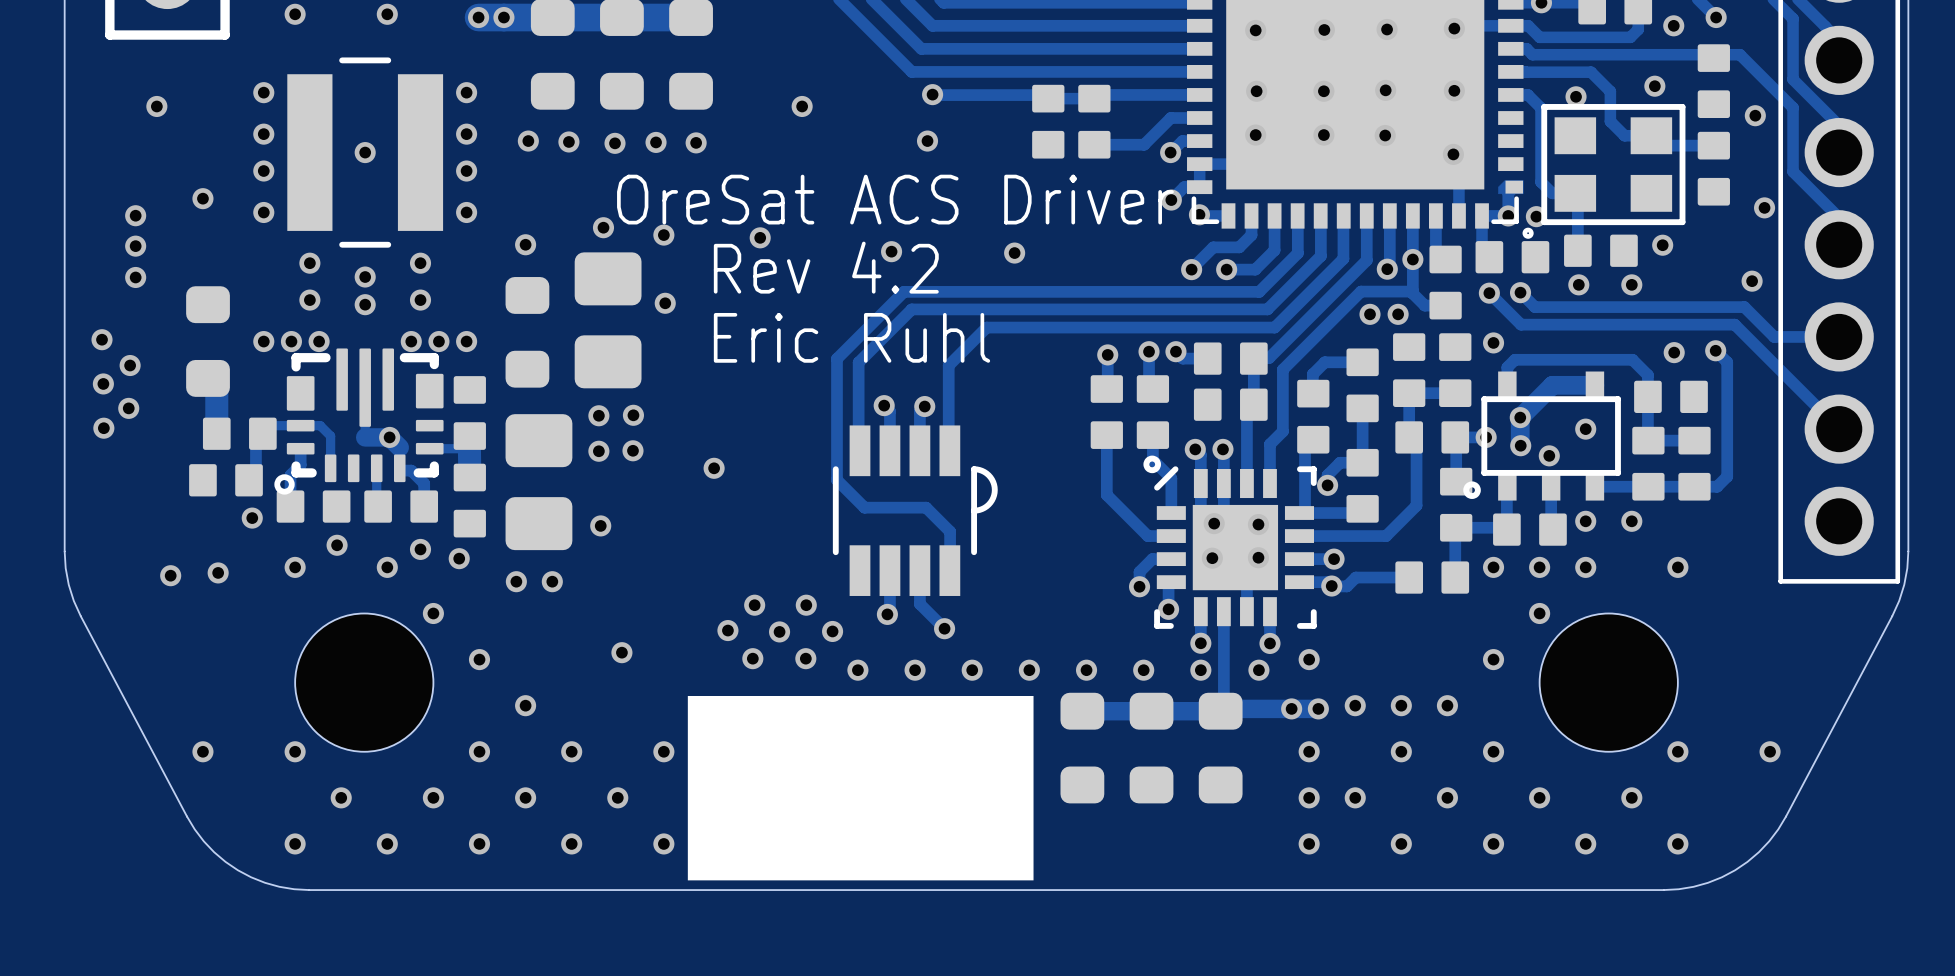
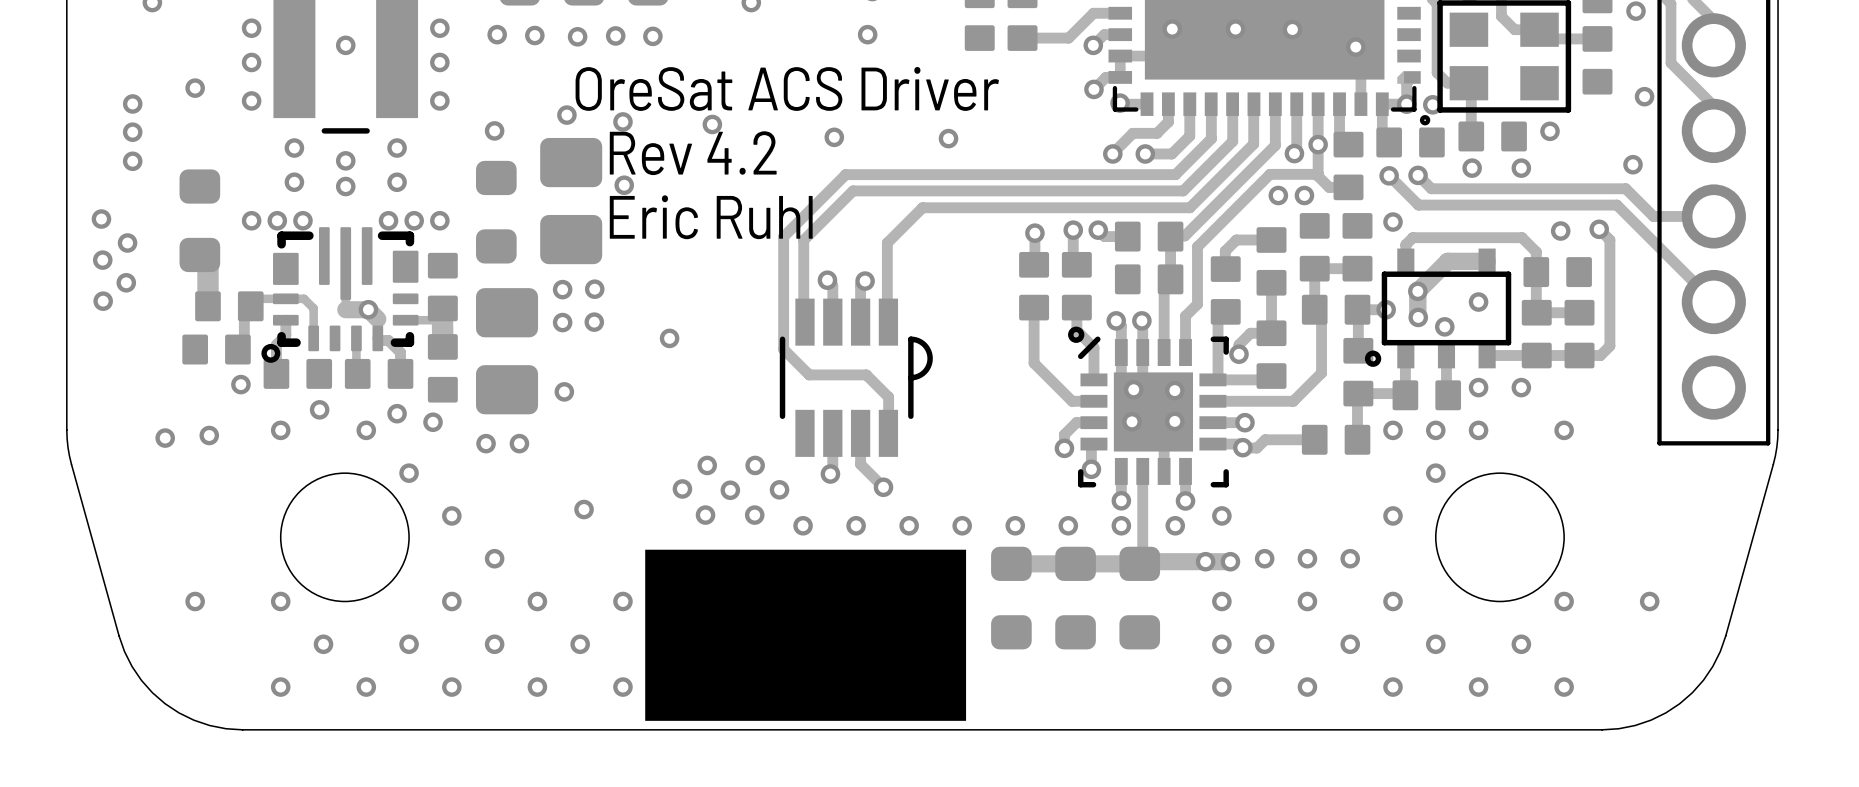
board edge: (64, 551) (68, 584) (80, 616) (194, 829) (214, 852) (237, 870) (265, 882) (279, 886) (309, 890) -> (66, 415) (69, 455) (119, 635) (124, 651) (141, 680) (165, 703) (178, 712) (209, 725) (242, 729) (293, 729)
board edge: (1908, 551) (1904, 584) (1892, 616) (1778, 829) (1758, 852) (1735, 870) (1707, 882) (1693, 886) (1663, 890) -> (1778, 415) (1775, 455) (1725, 635) (1720, 651) (1703, 680) (1679, 703) (1665, 712) (1635, 725) (1602, 729) (1551, 729)

